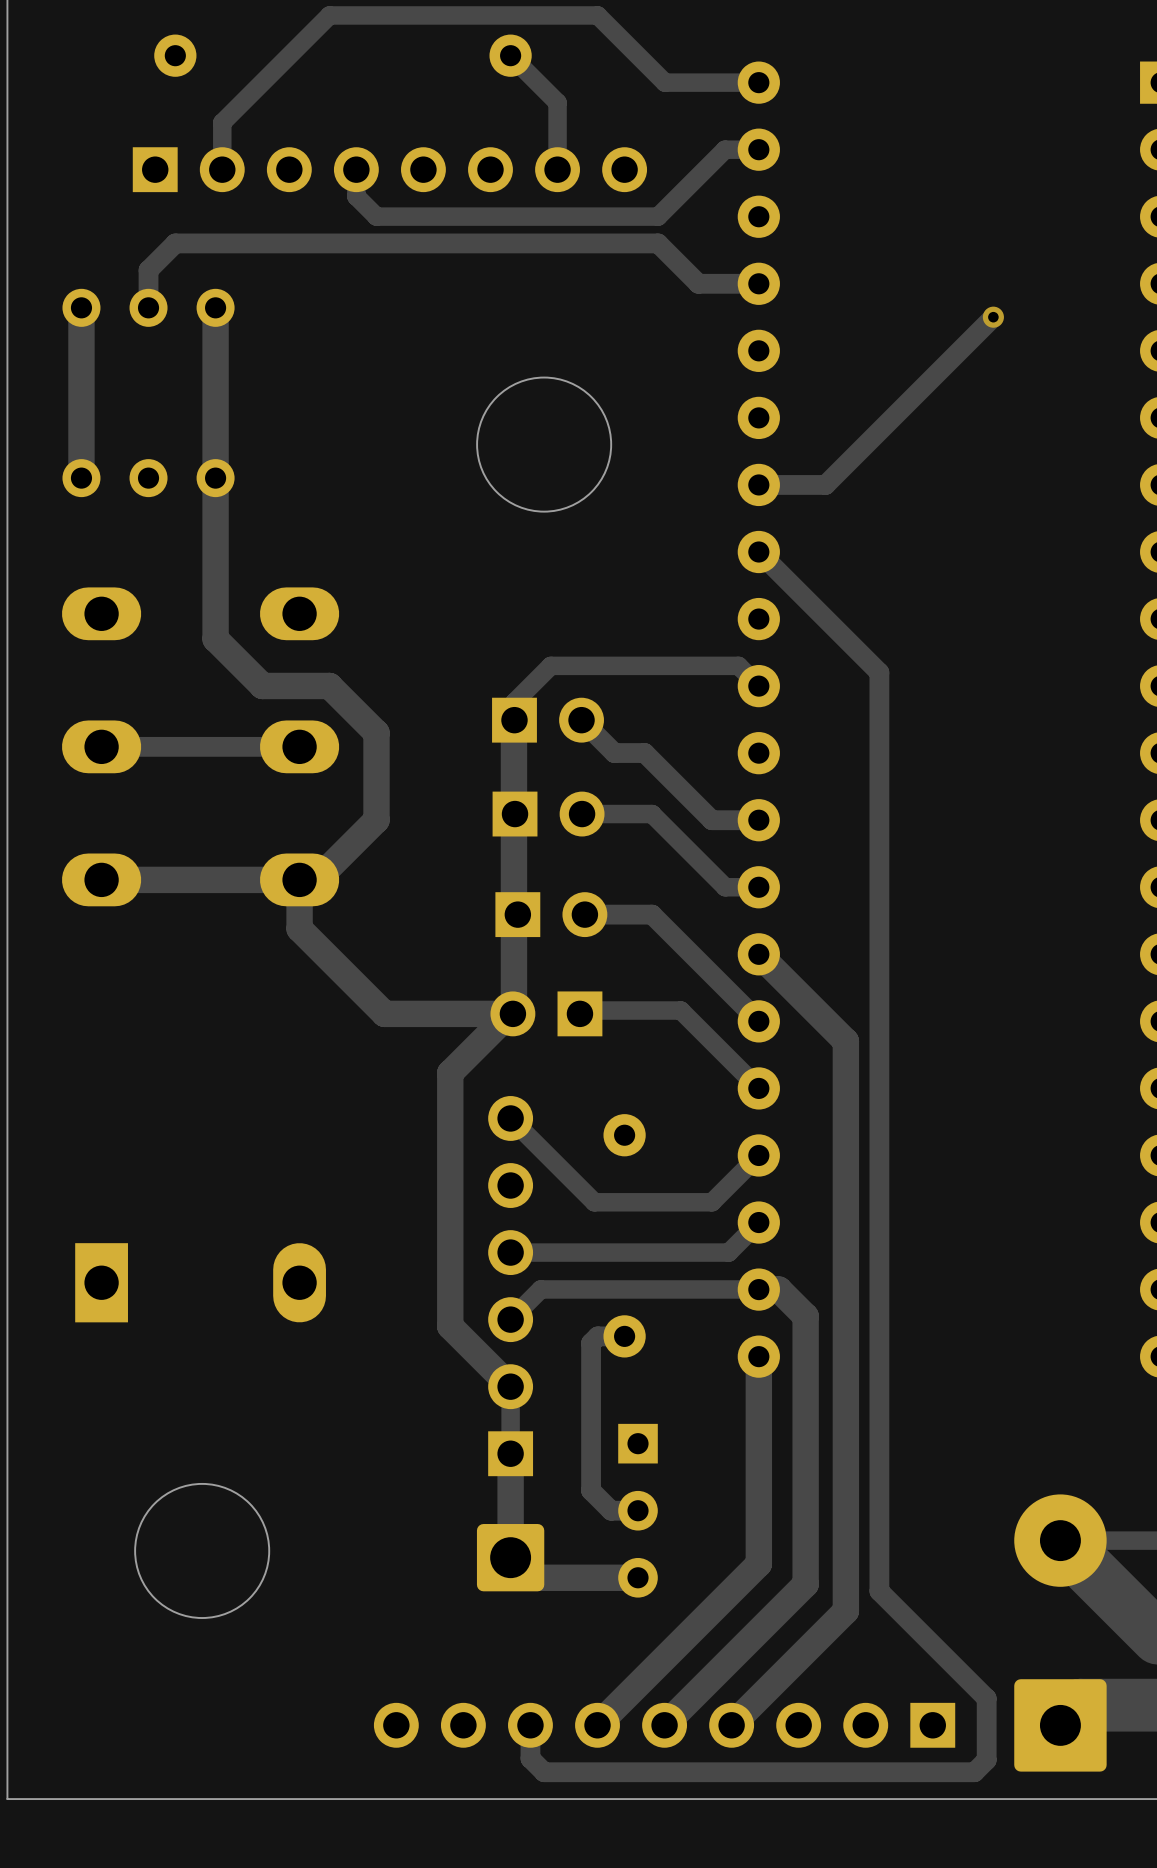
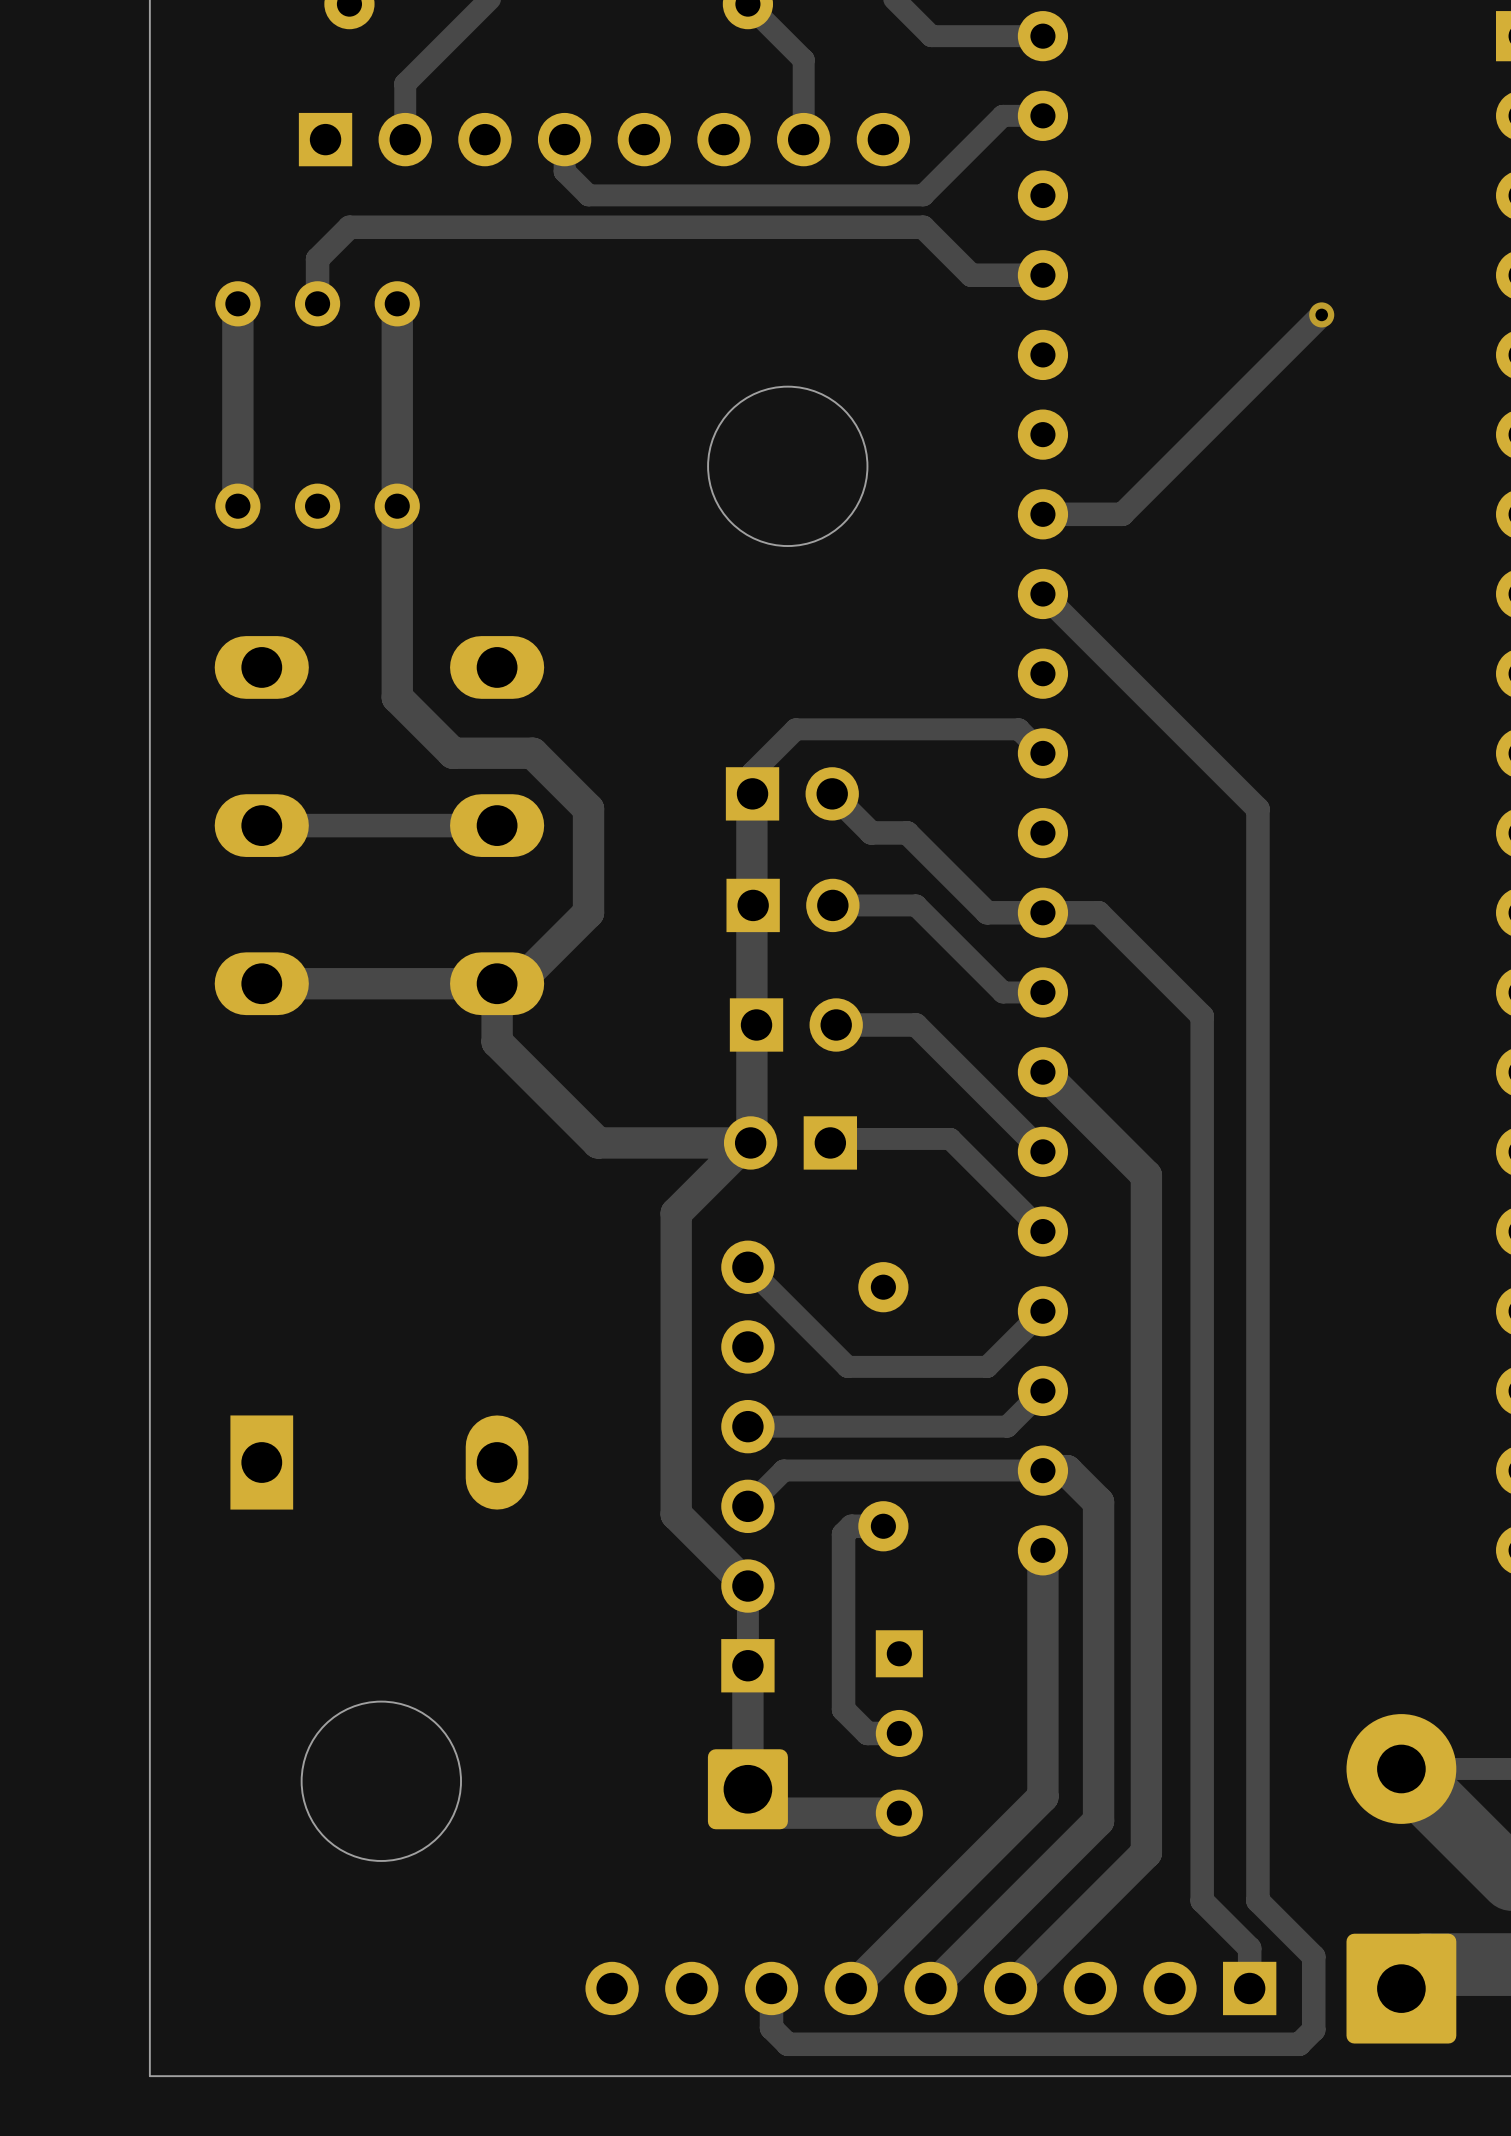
track: (879, 672) (879, 1591) (939, 1651) -> (1186, 737) (1257, 809) (1257, 1900)
track: none -> (1042, 912) (1098, 912) (1202, 1016) (1202, 1900) (1249, 1948) (1249, 1988)

